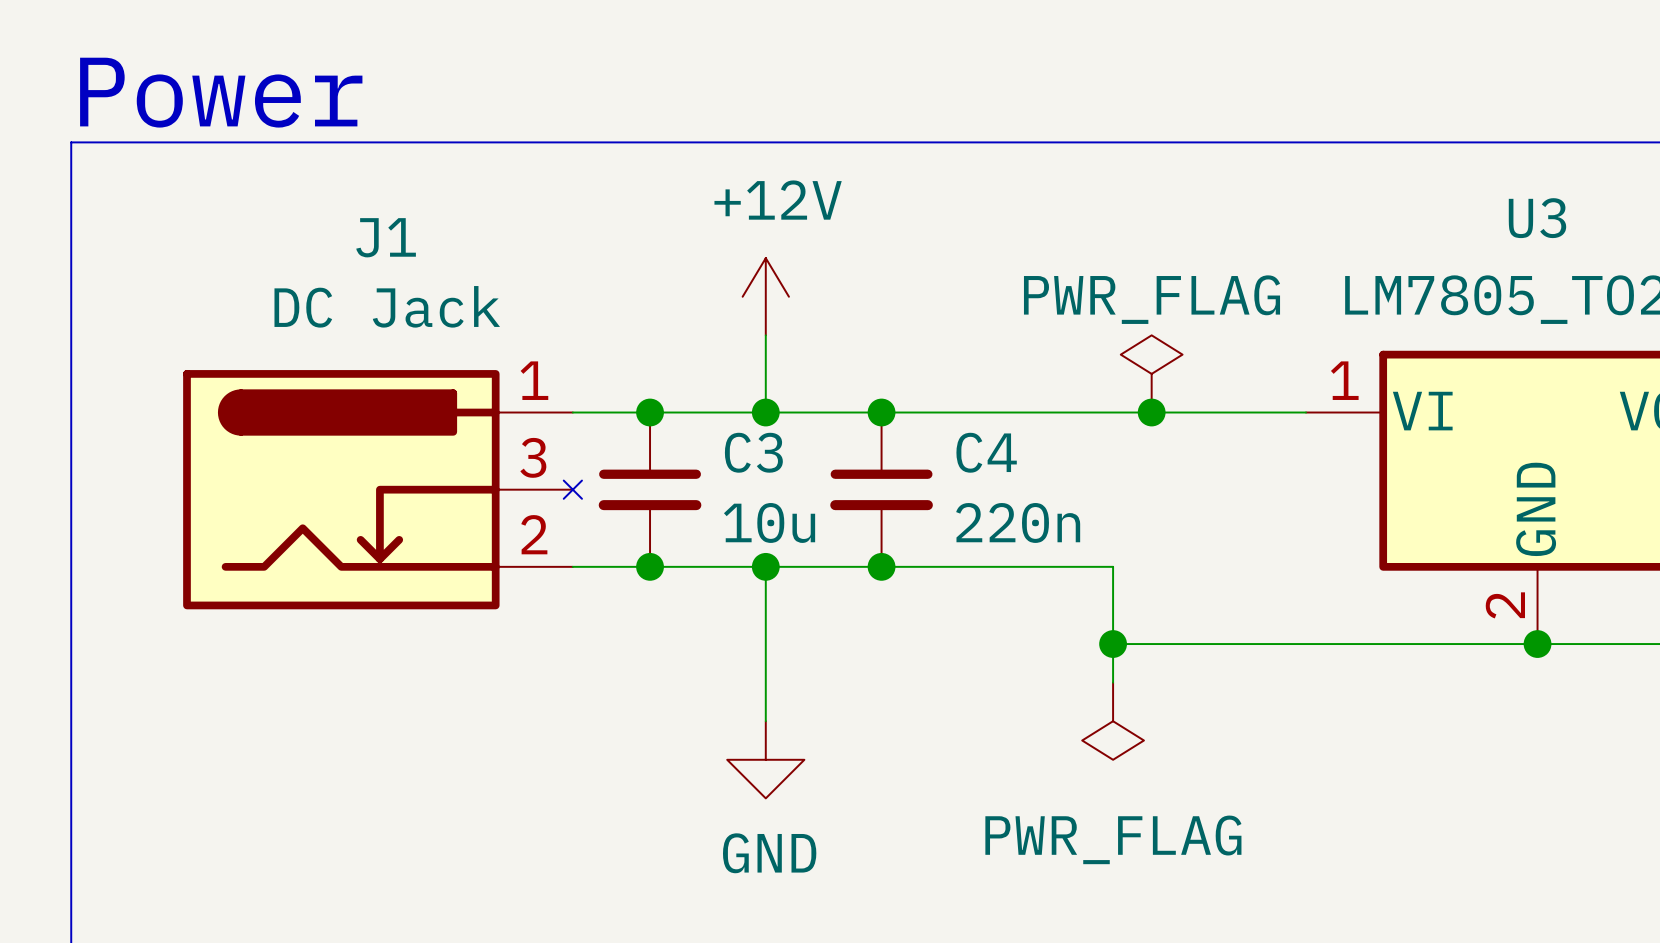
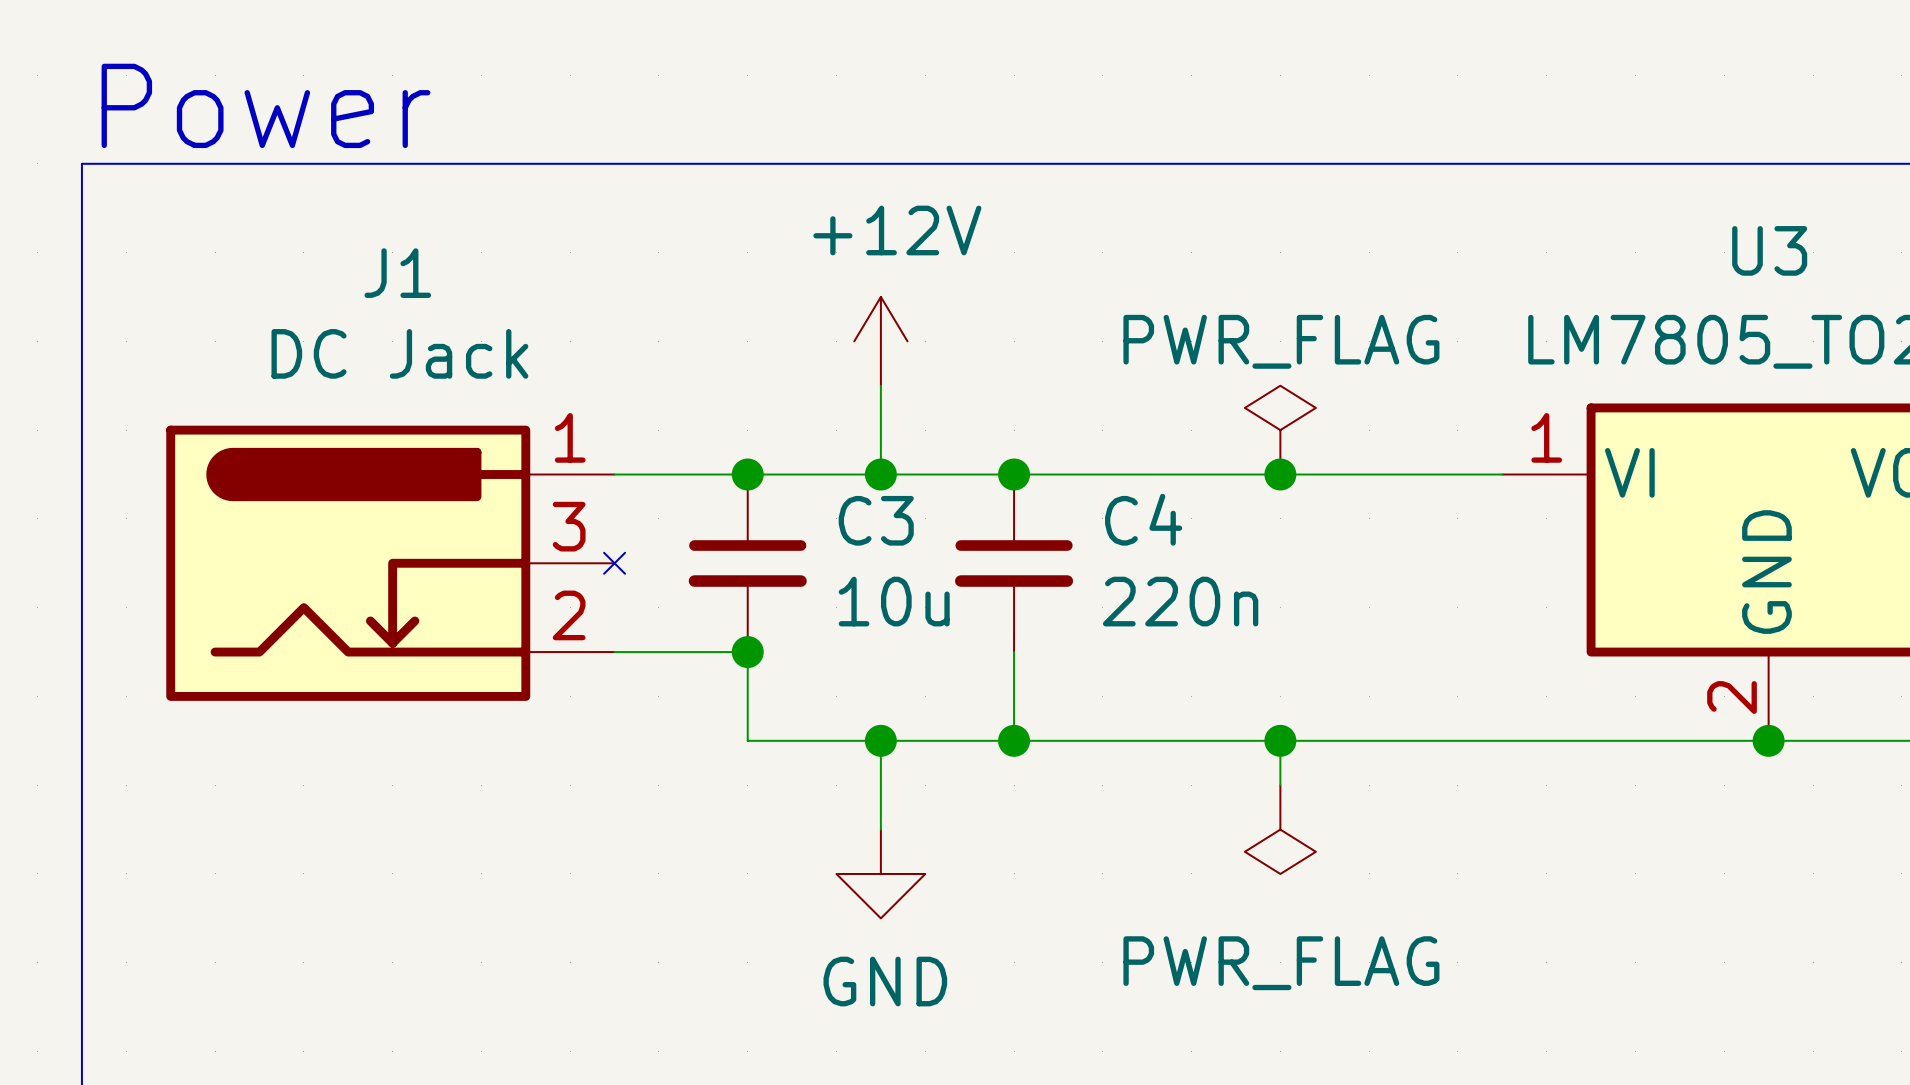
power symbol position: PWR_FLAG (1151, 373) -> PWR_FLAG (1280, 430)
junction position: (1151, 412) -> (1280, 474)
J1 position: (382, 489) -> (395, 563)
wire: (650, 566) (1113, 566) (1113, 644) -> (747, 652) (747, 740) (1280, 740)
wire: (765, 566) (765, 644) -> (1014, 652) (1014, 740)
junction: (765, 566) -> none
junction: (881, 566) -> none
junction: none -> (880, 740)
junction: none -> (1014, 740)

